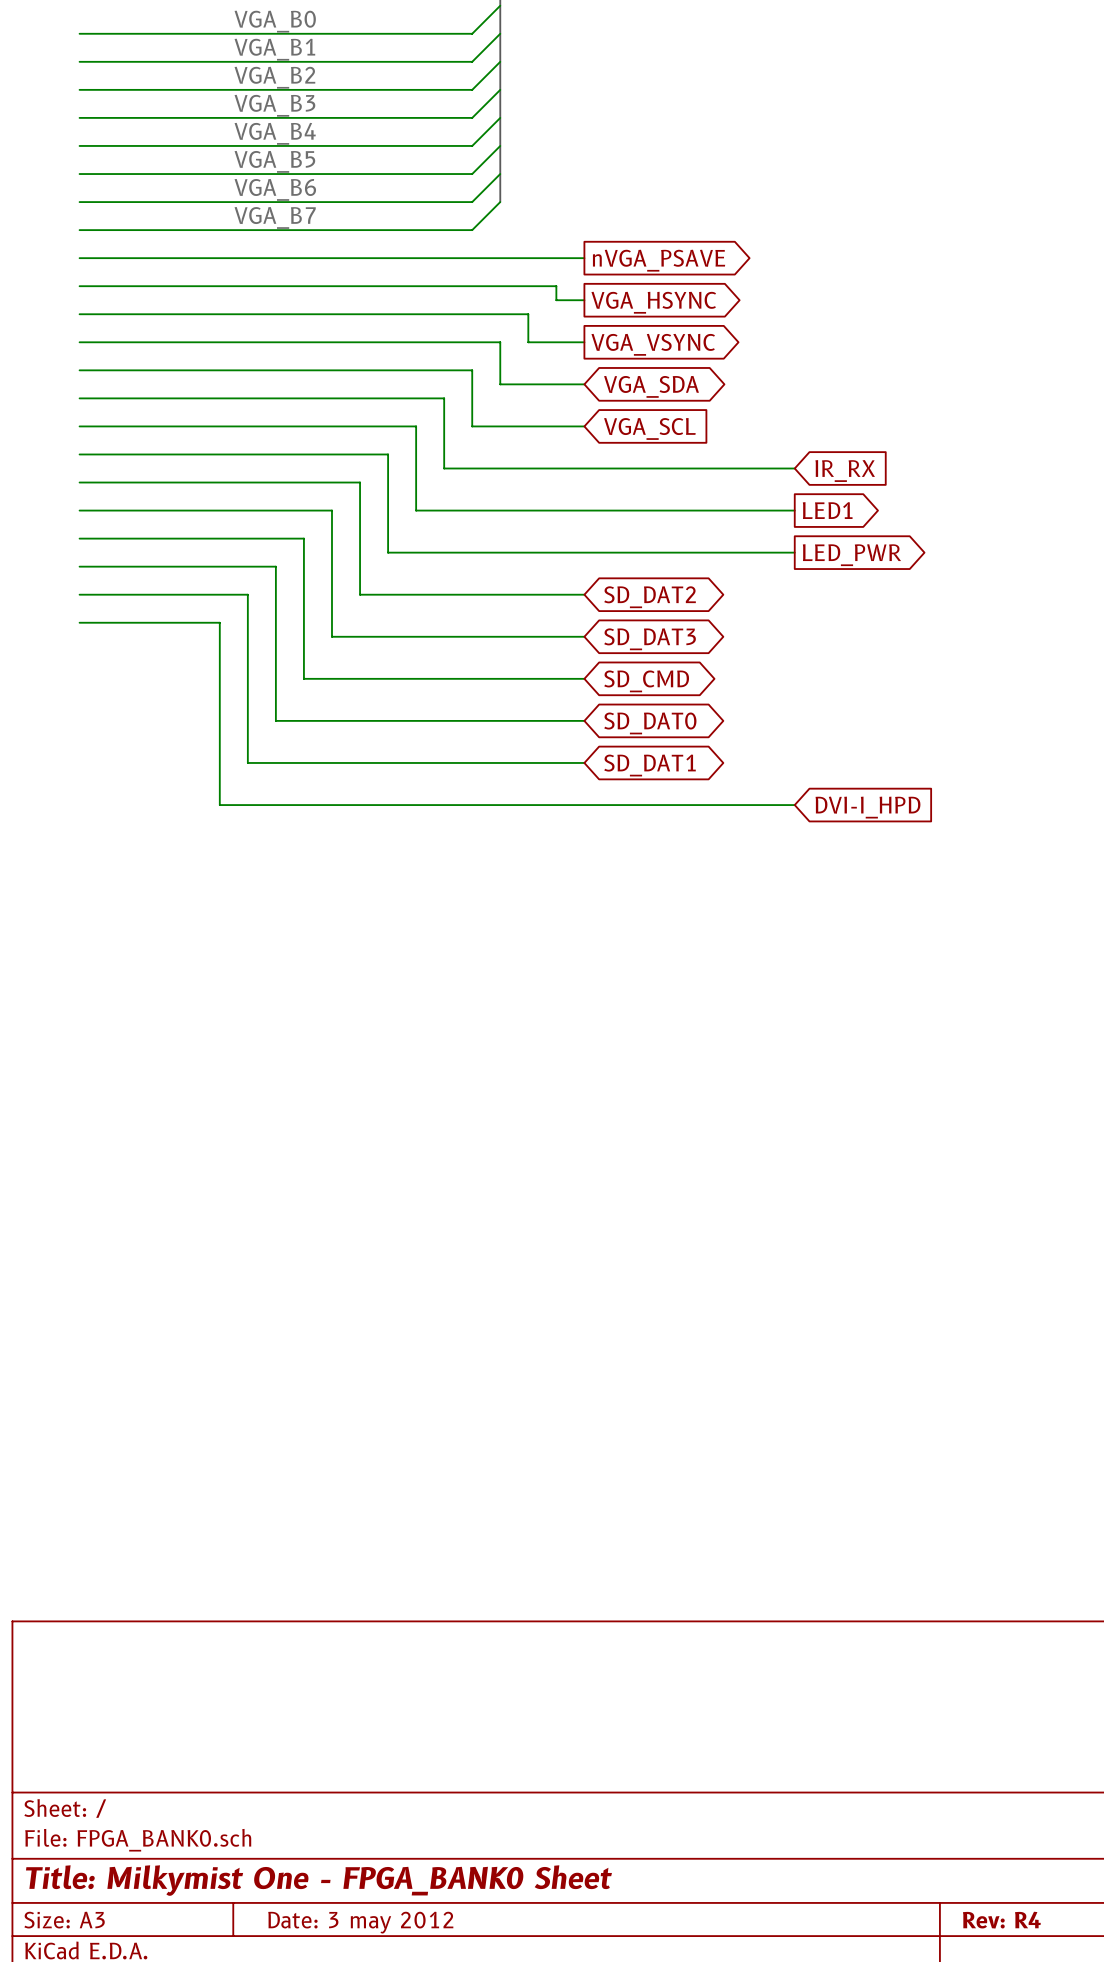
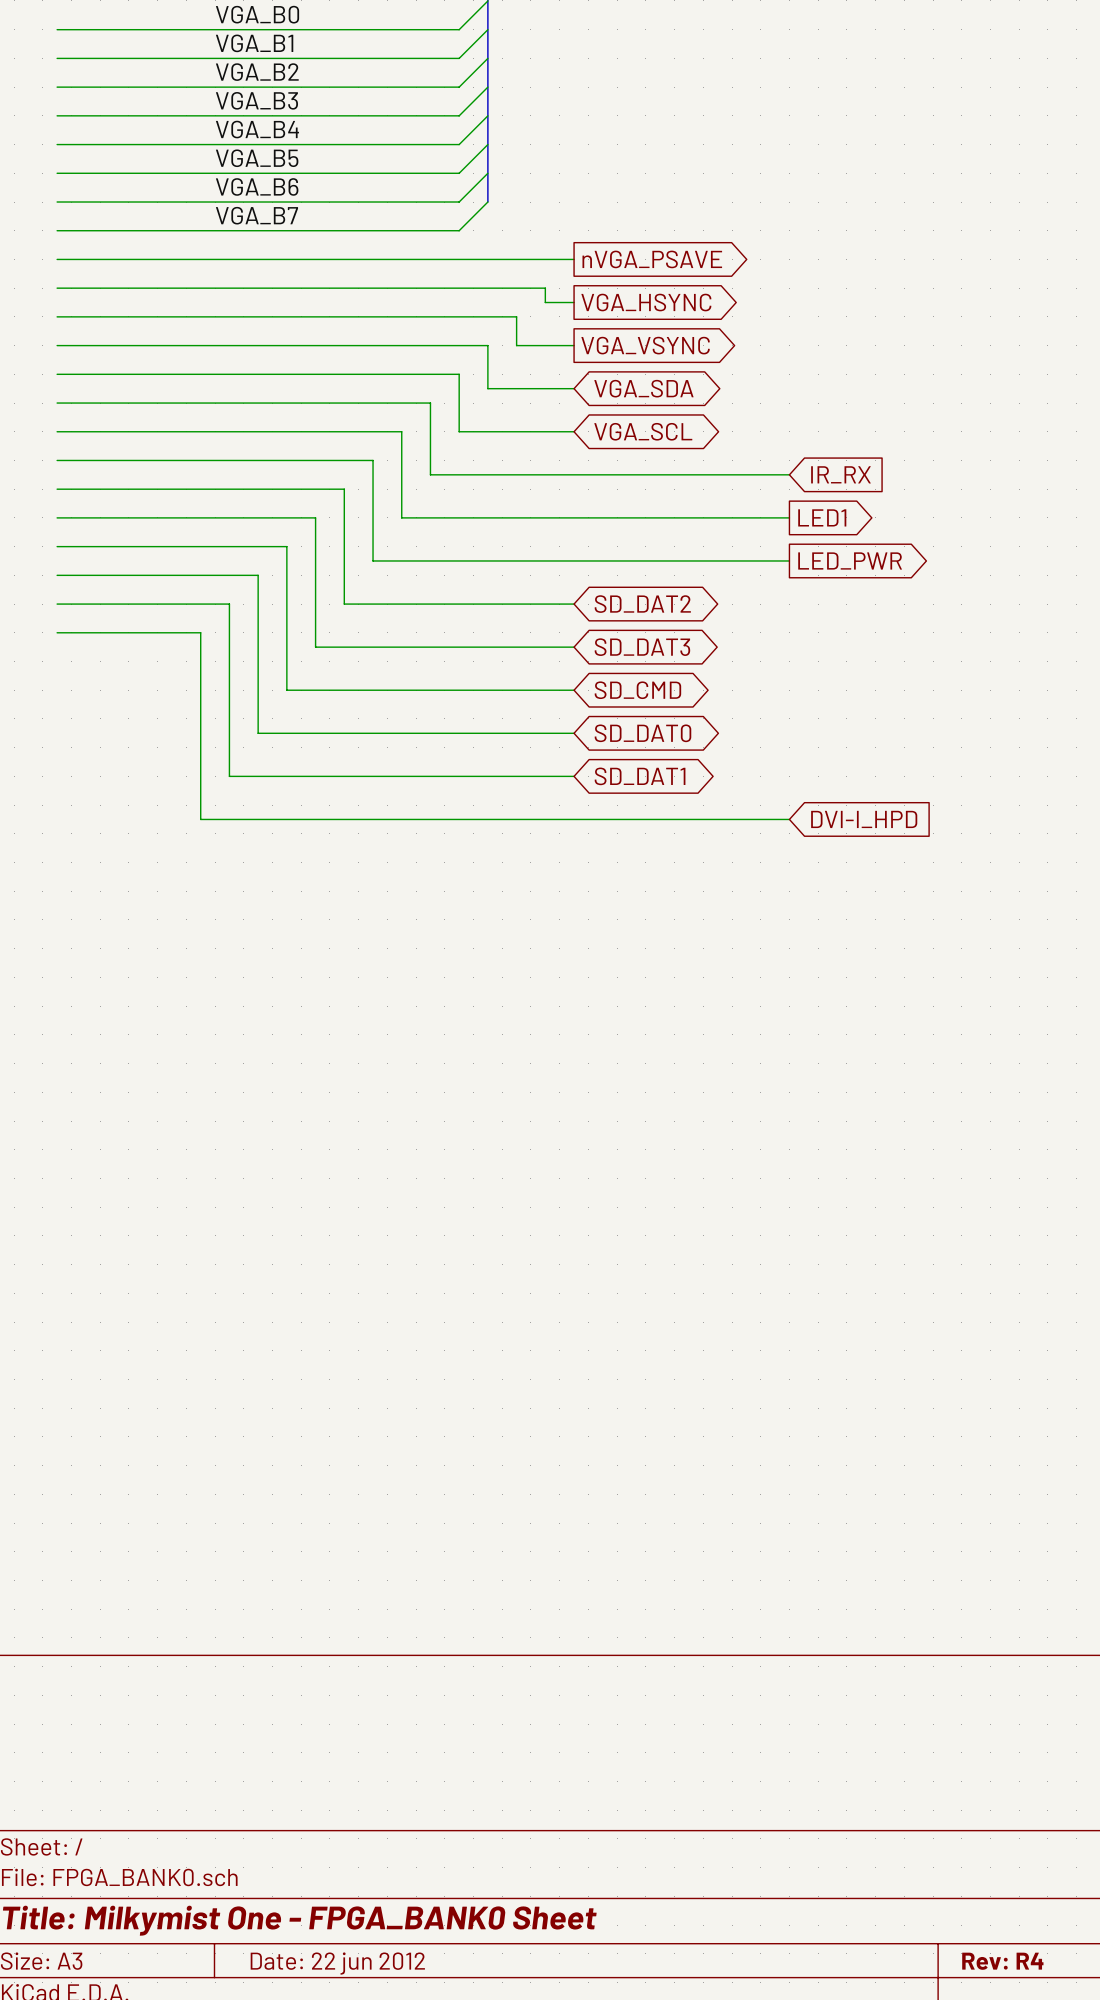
global label shape: input (649, 428) -> bidirectional (643, 431)
title block: Date: 3 may 2012 (360, 1922) -> Date: 22 jun 2012 (337, 1963)

